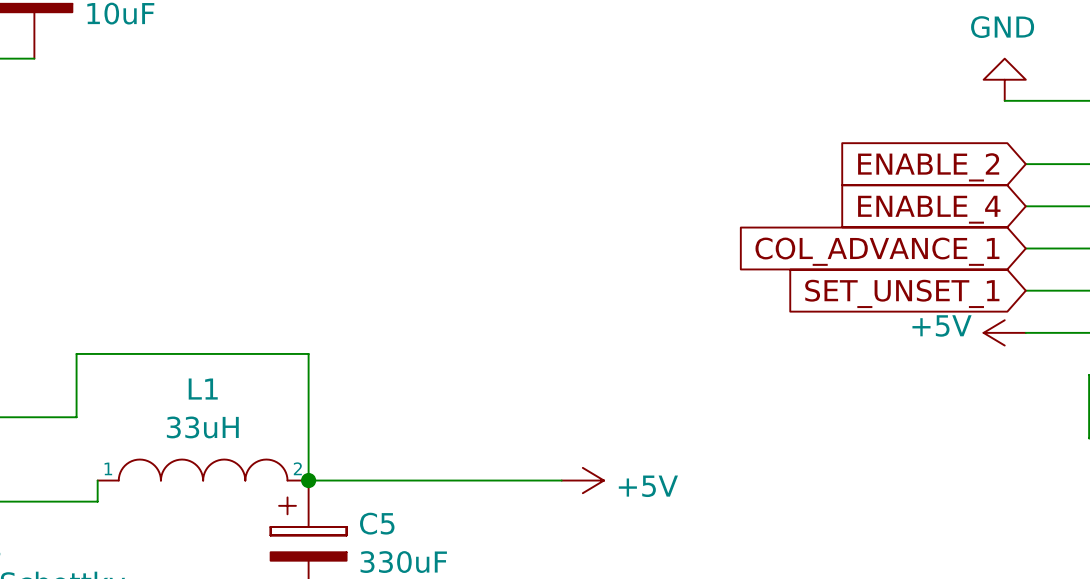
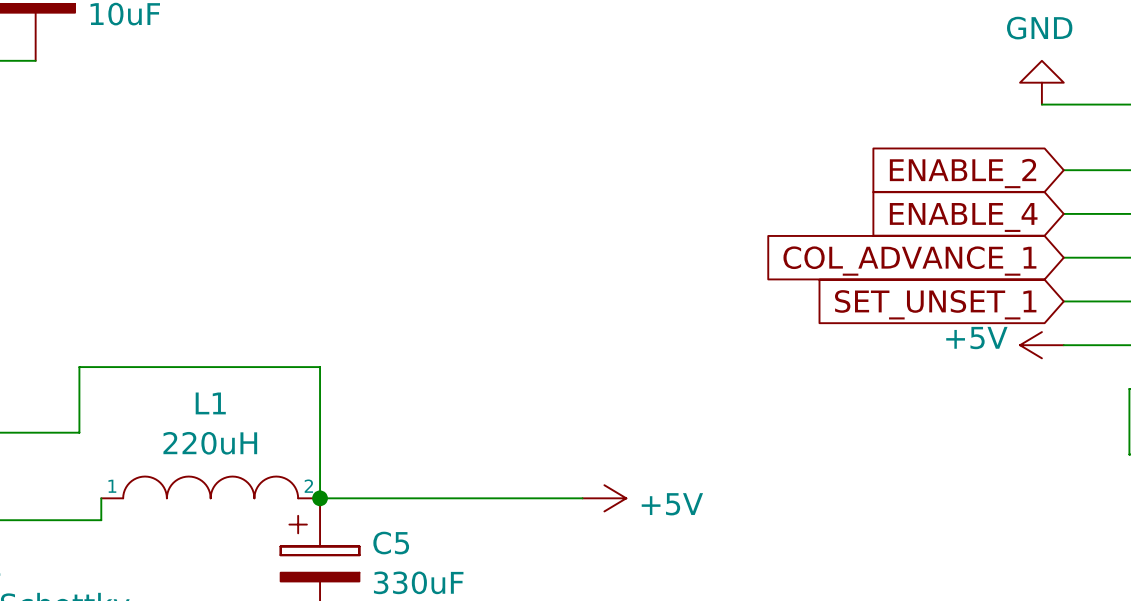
L1 value: 33uH (202, 427) -> 220uH (210, 443)

